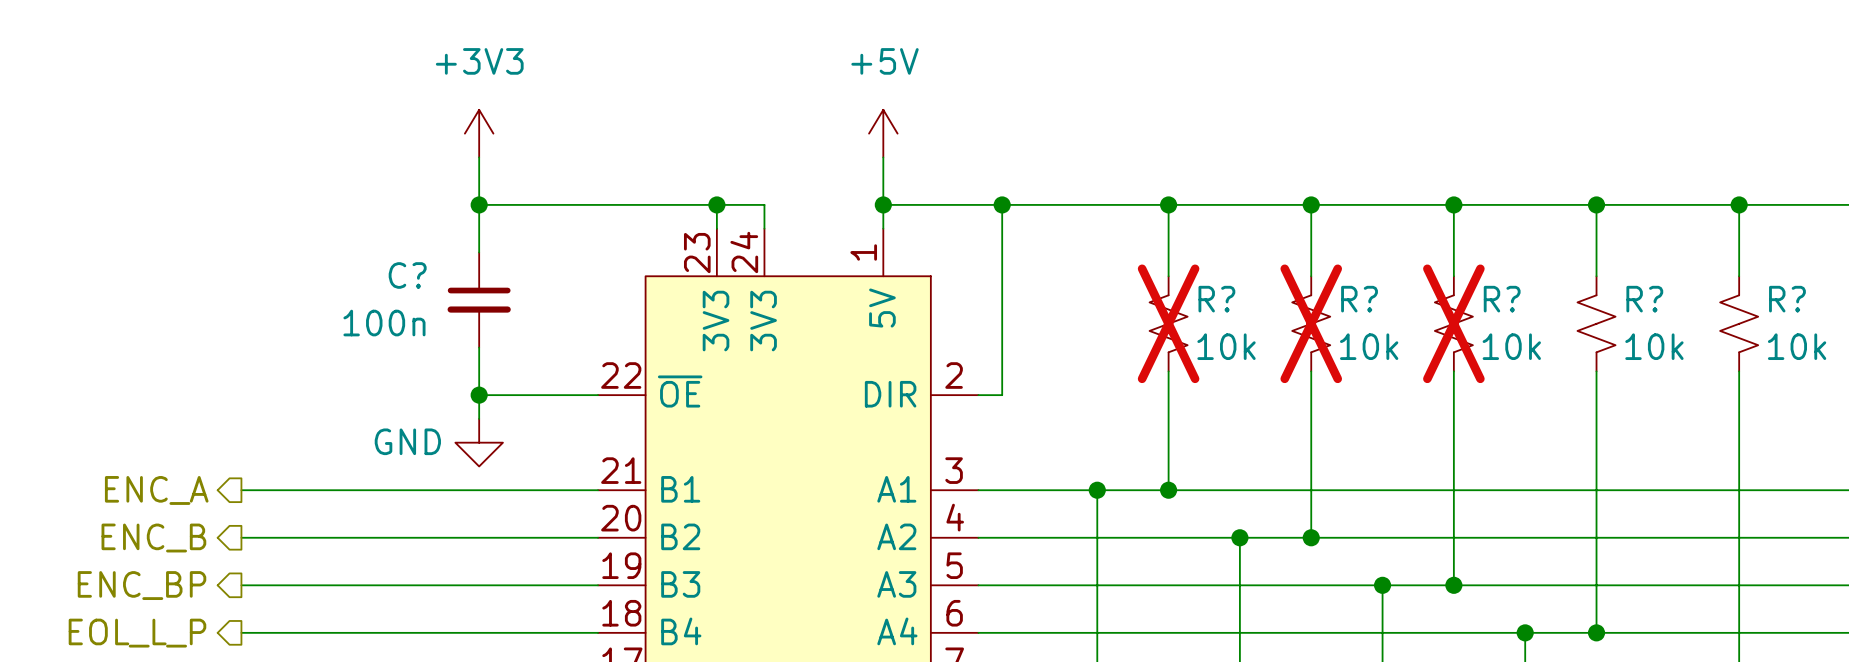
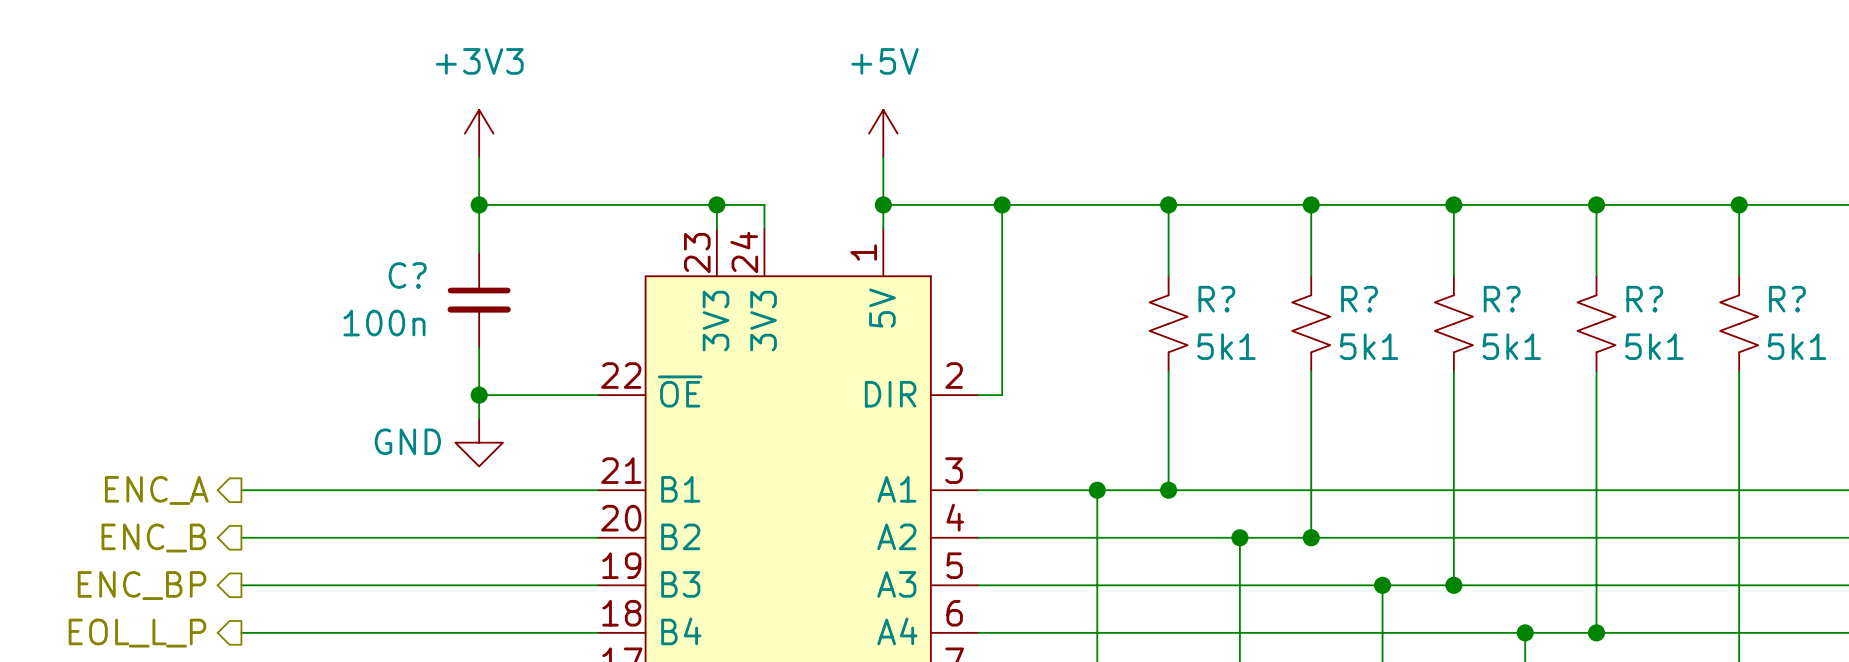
R? do-not-place cross: (1168, 323) -> none
R? do-not-place cross: (1311, 323) -> none
R? do-not-place cross: (1453, 323) -> none
R? value: 10k (1226, 346) -> 5k1 (1226, 346)
R? value: 10k (1369, 346) -> 5k1 (1369, 346)
R? value: 10k (1511, 346) -> 5k1 (1511, 346)
R? value: 10k (1654, 346) -> 5k1 (1654, 346)
R? value: 10k (1797, 346) -> 5k1 (1797, 346)

